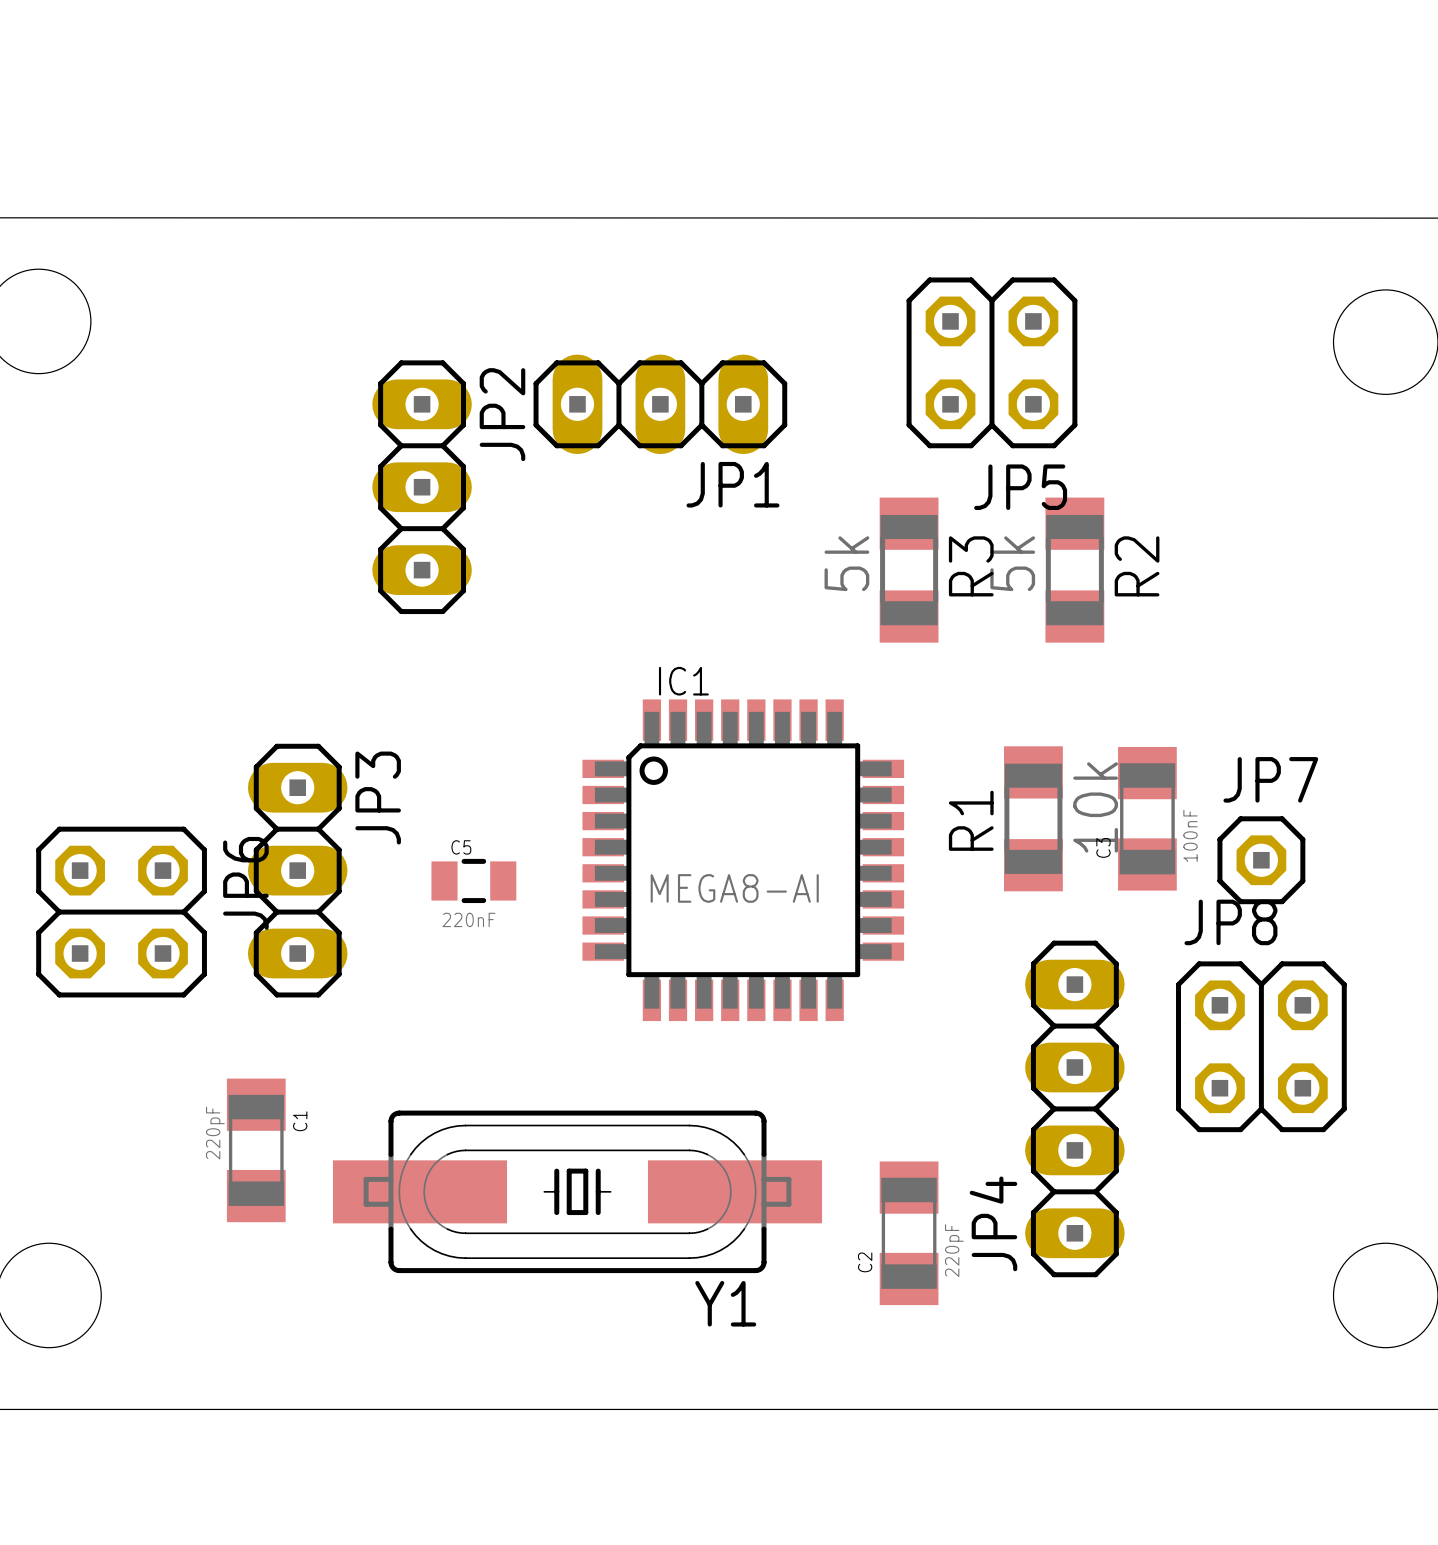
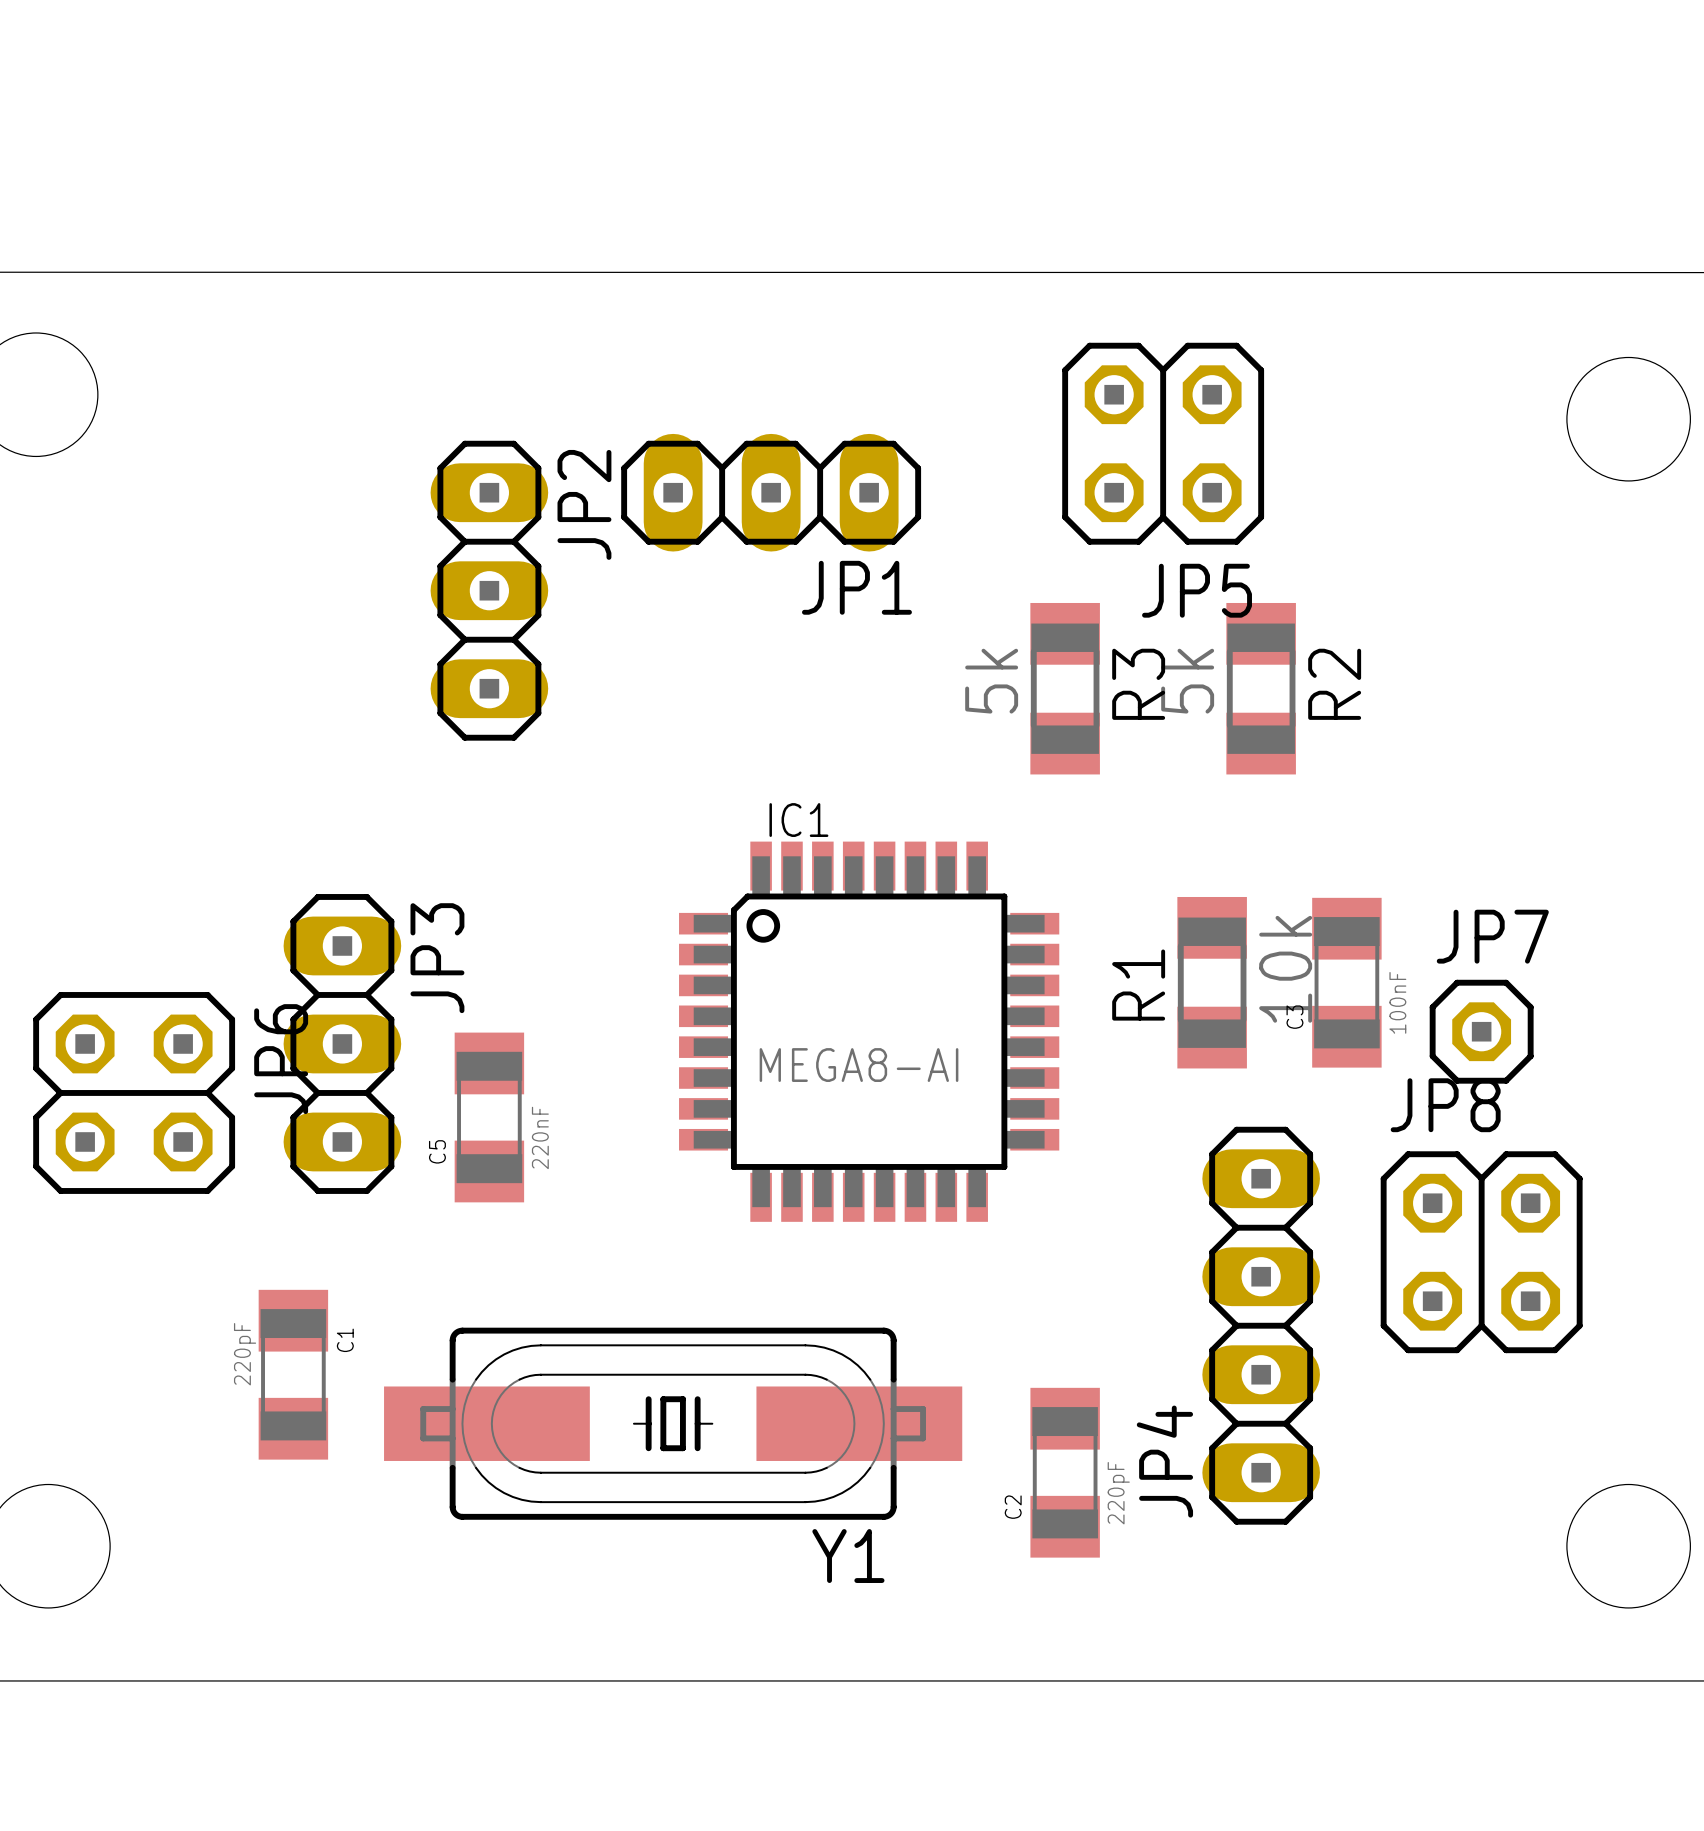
C5 name position: C5 (461, 847) -> C5 (437, 1151)
C5 footprint: [431, 858, 517, 904] -> [454, 1032, 525, 1203]

